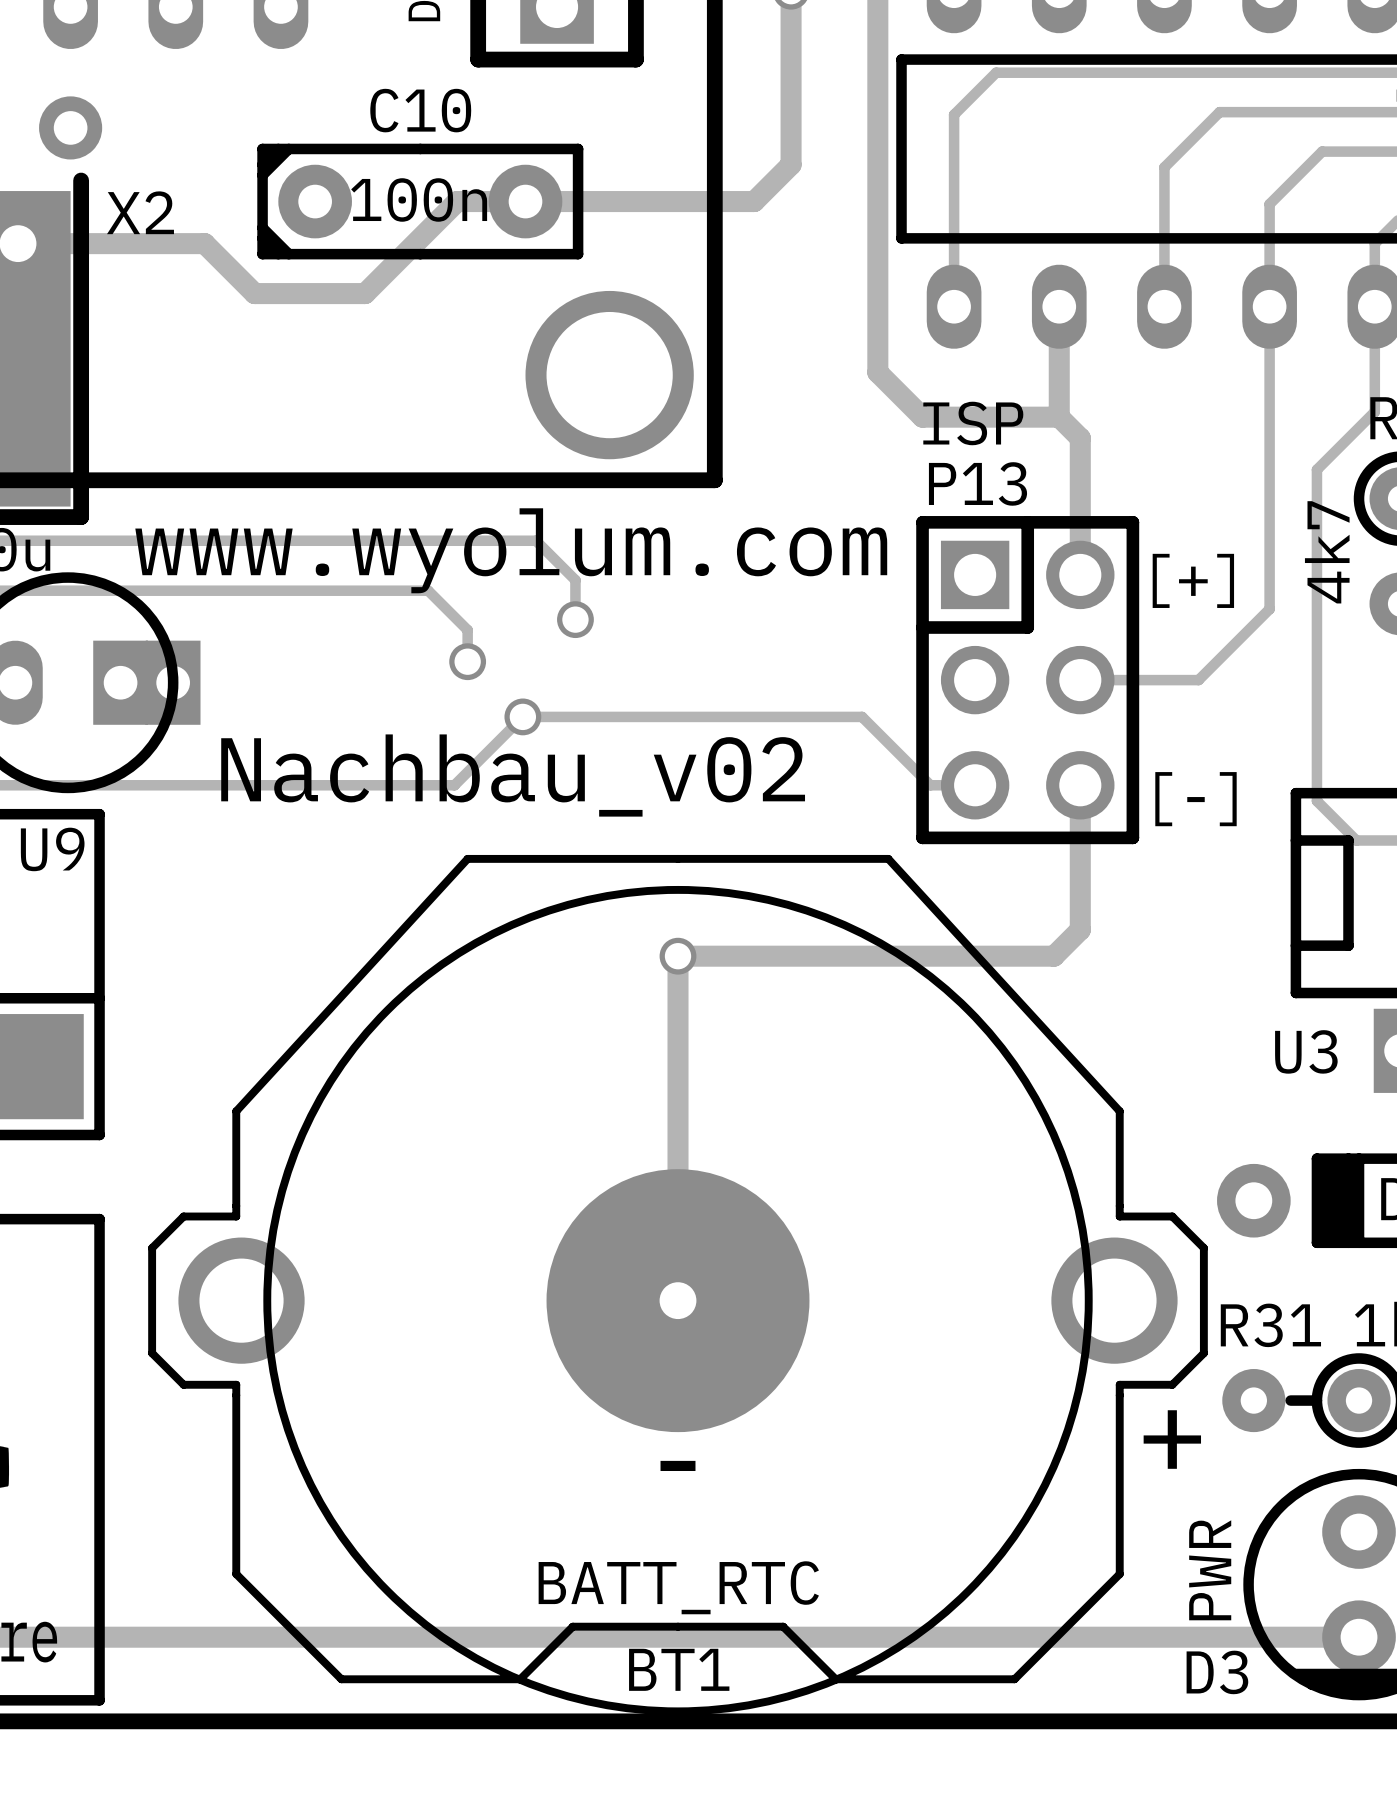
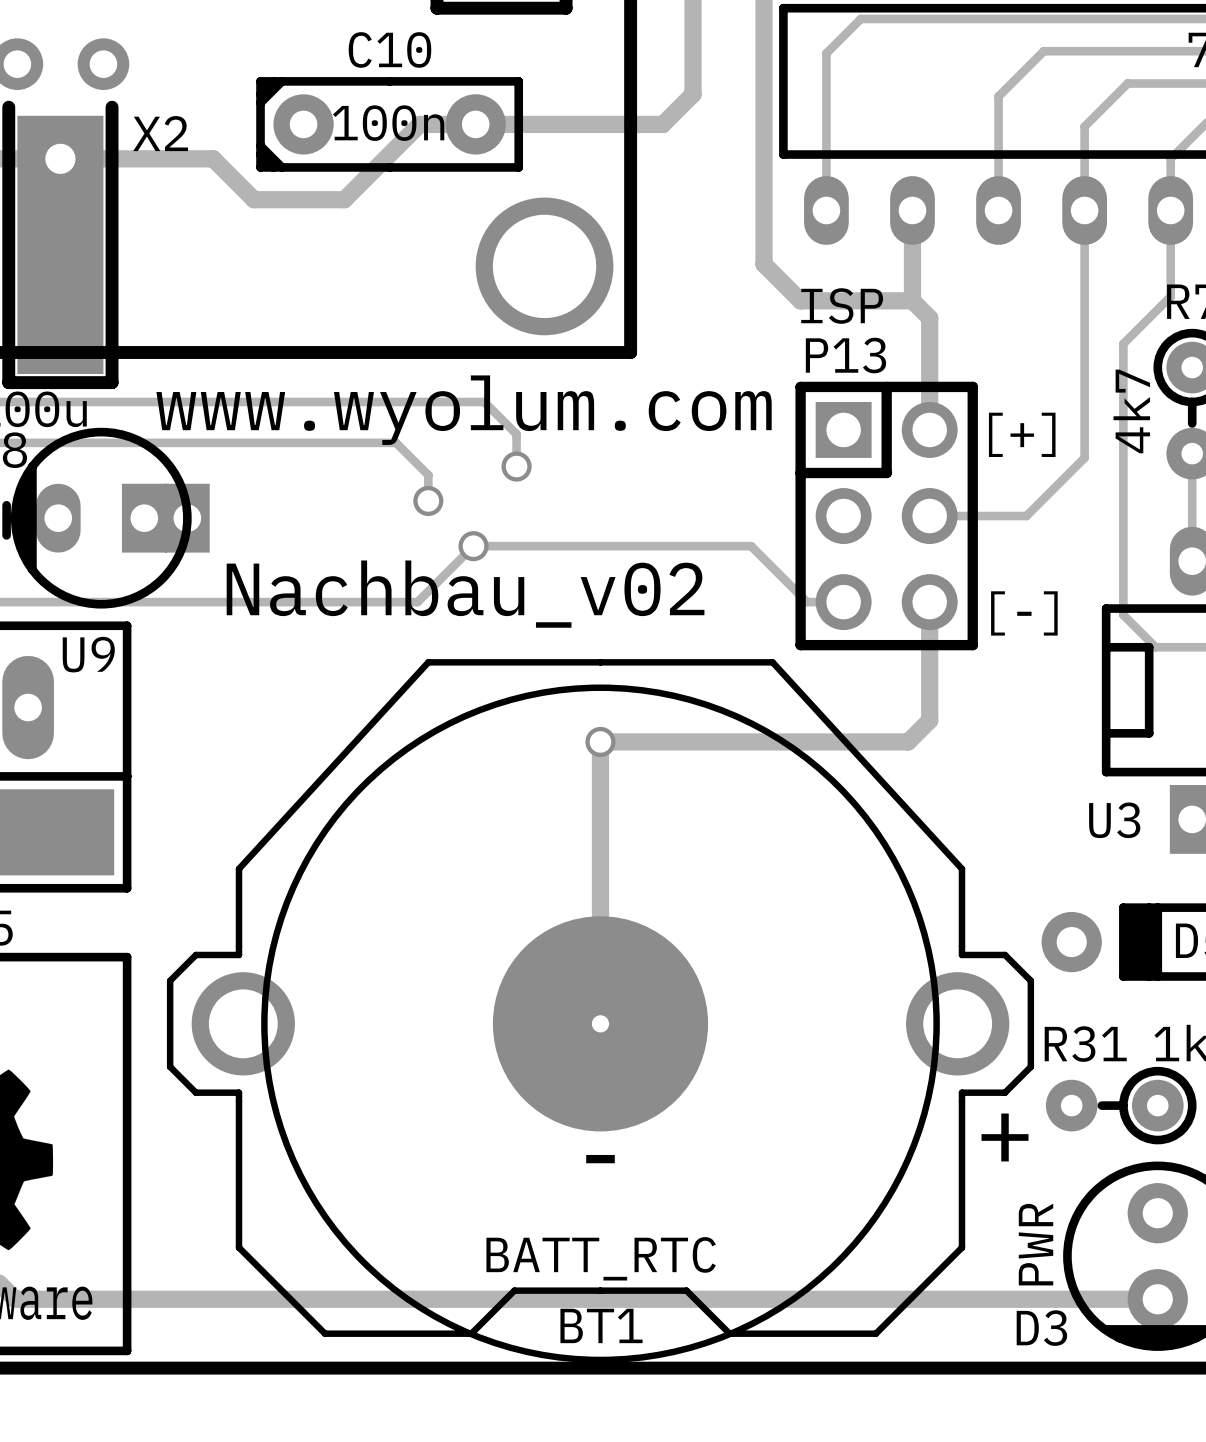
BT1 footprint: [148, 854, 1208, 1716] -> [166, 659, 1035, 1364]

